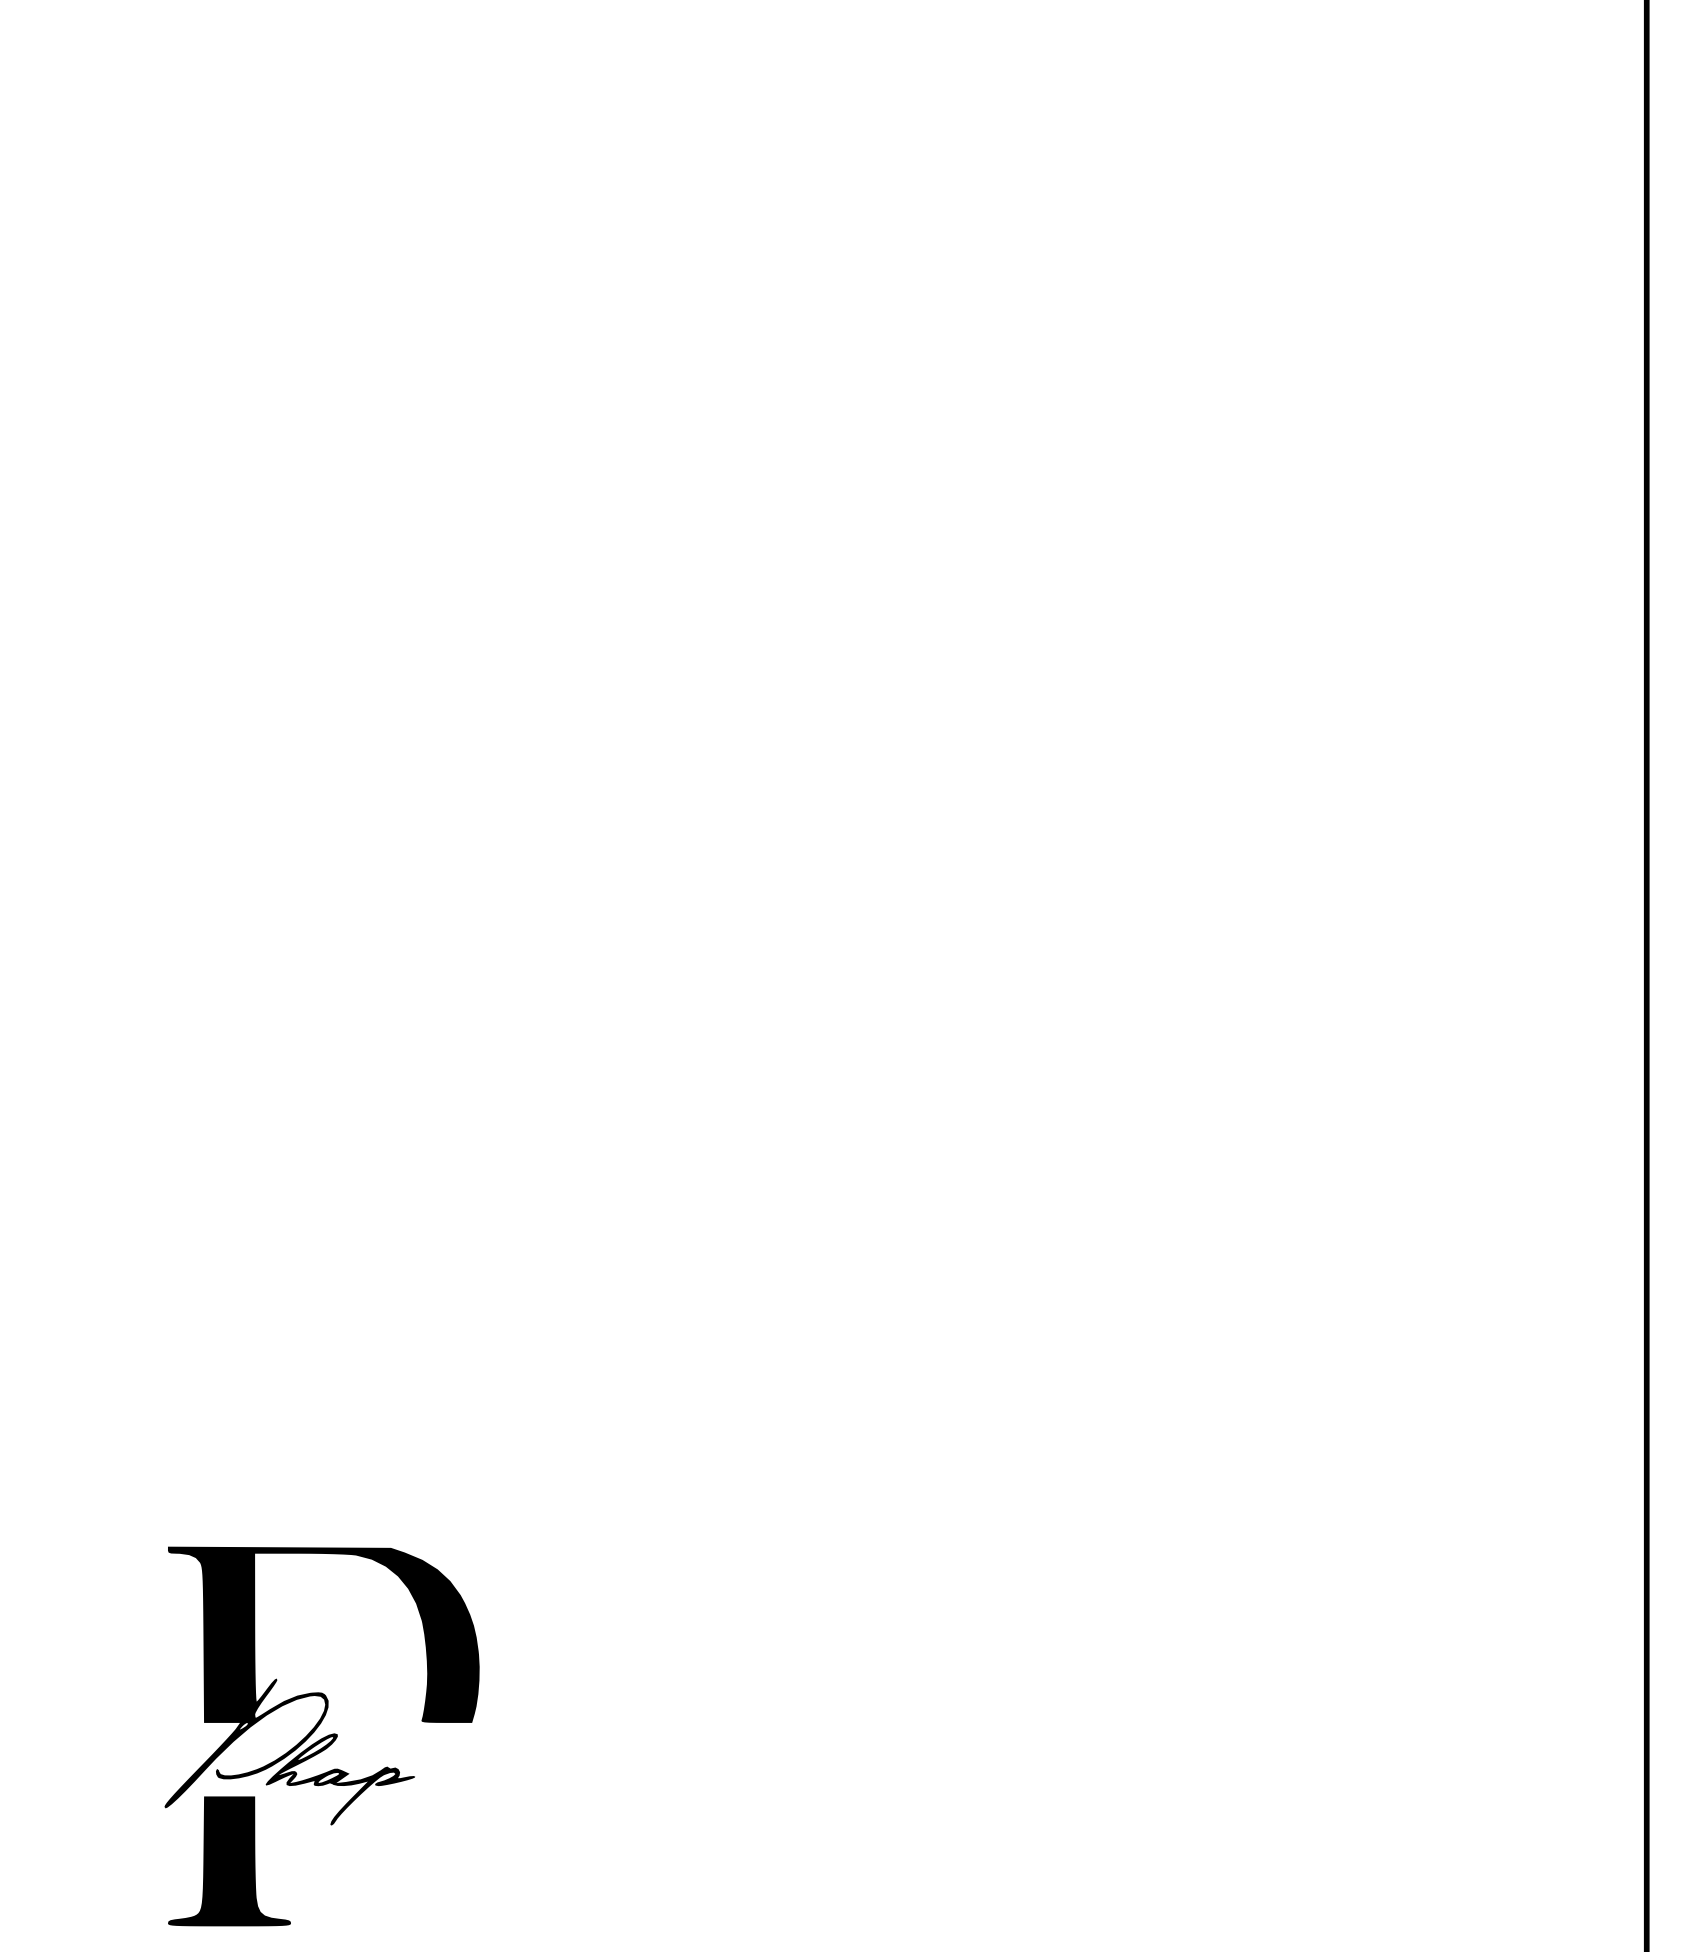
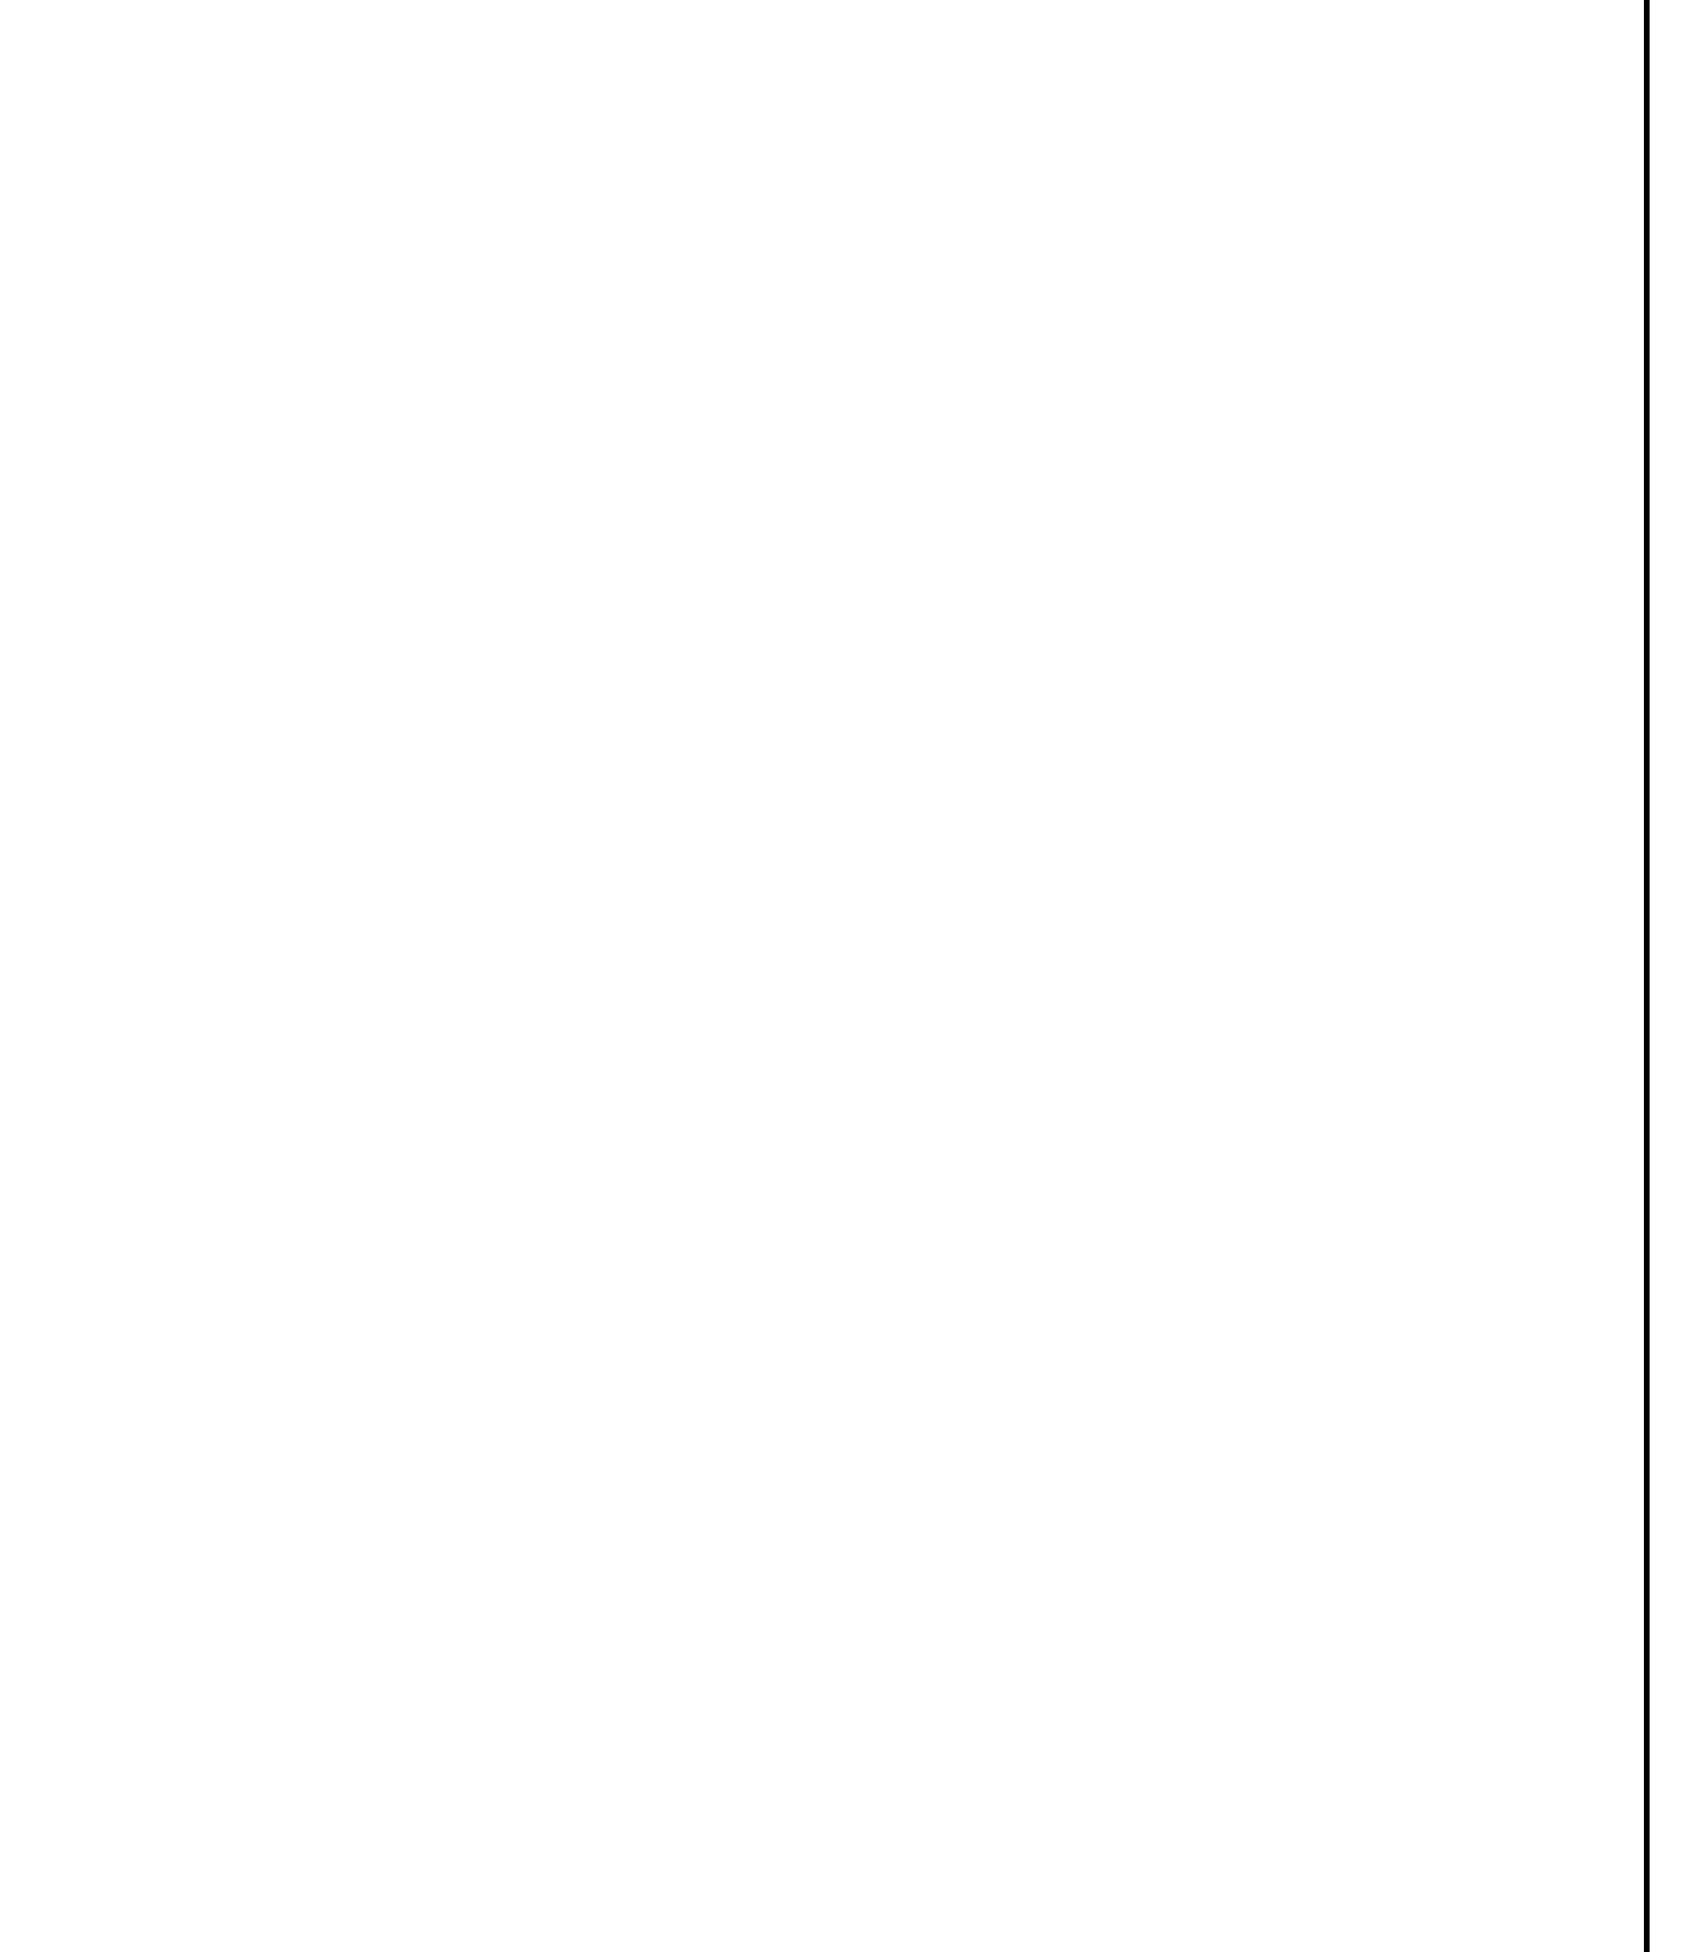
drawing: [164, 1546, 480, 1927] -> none

